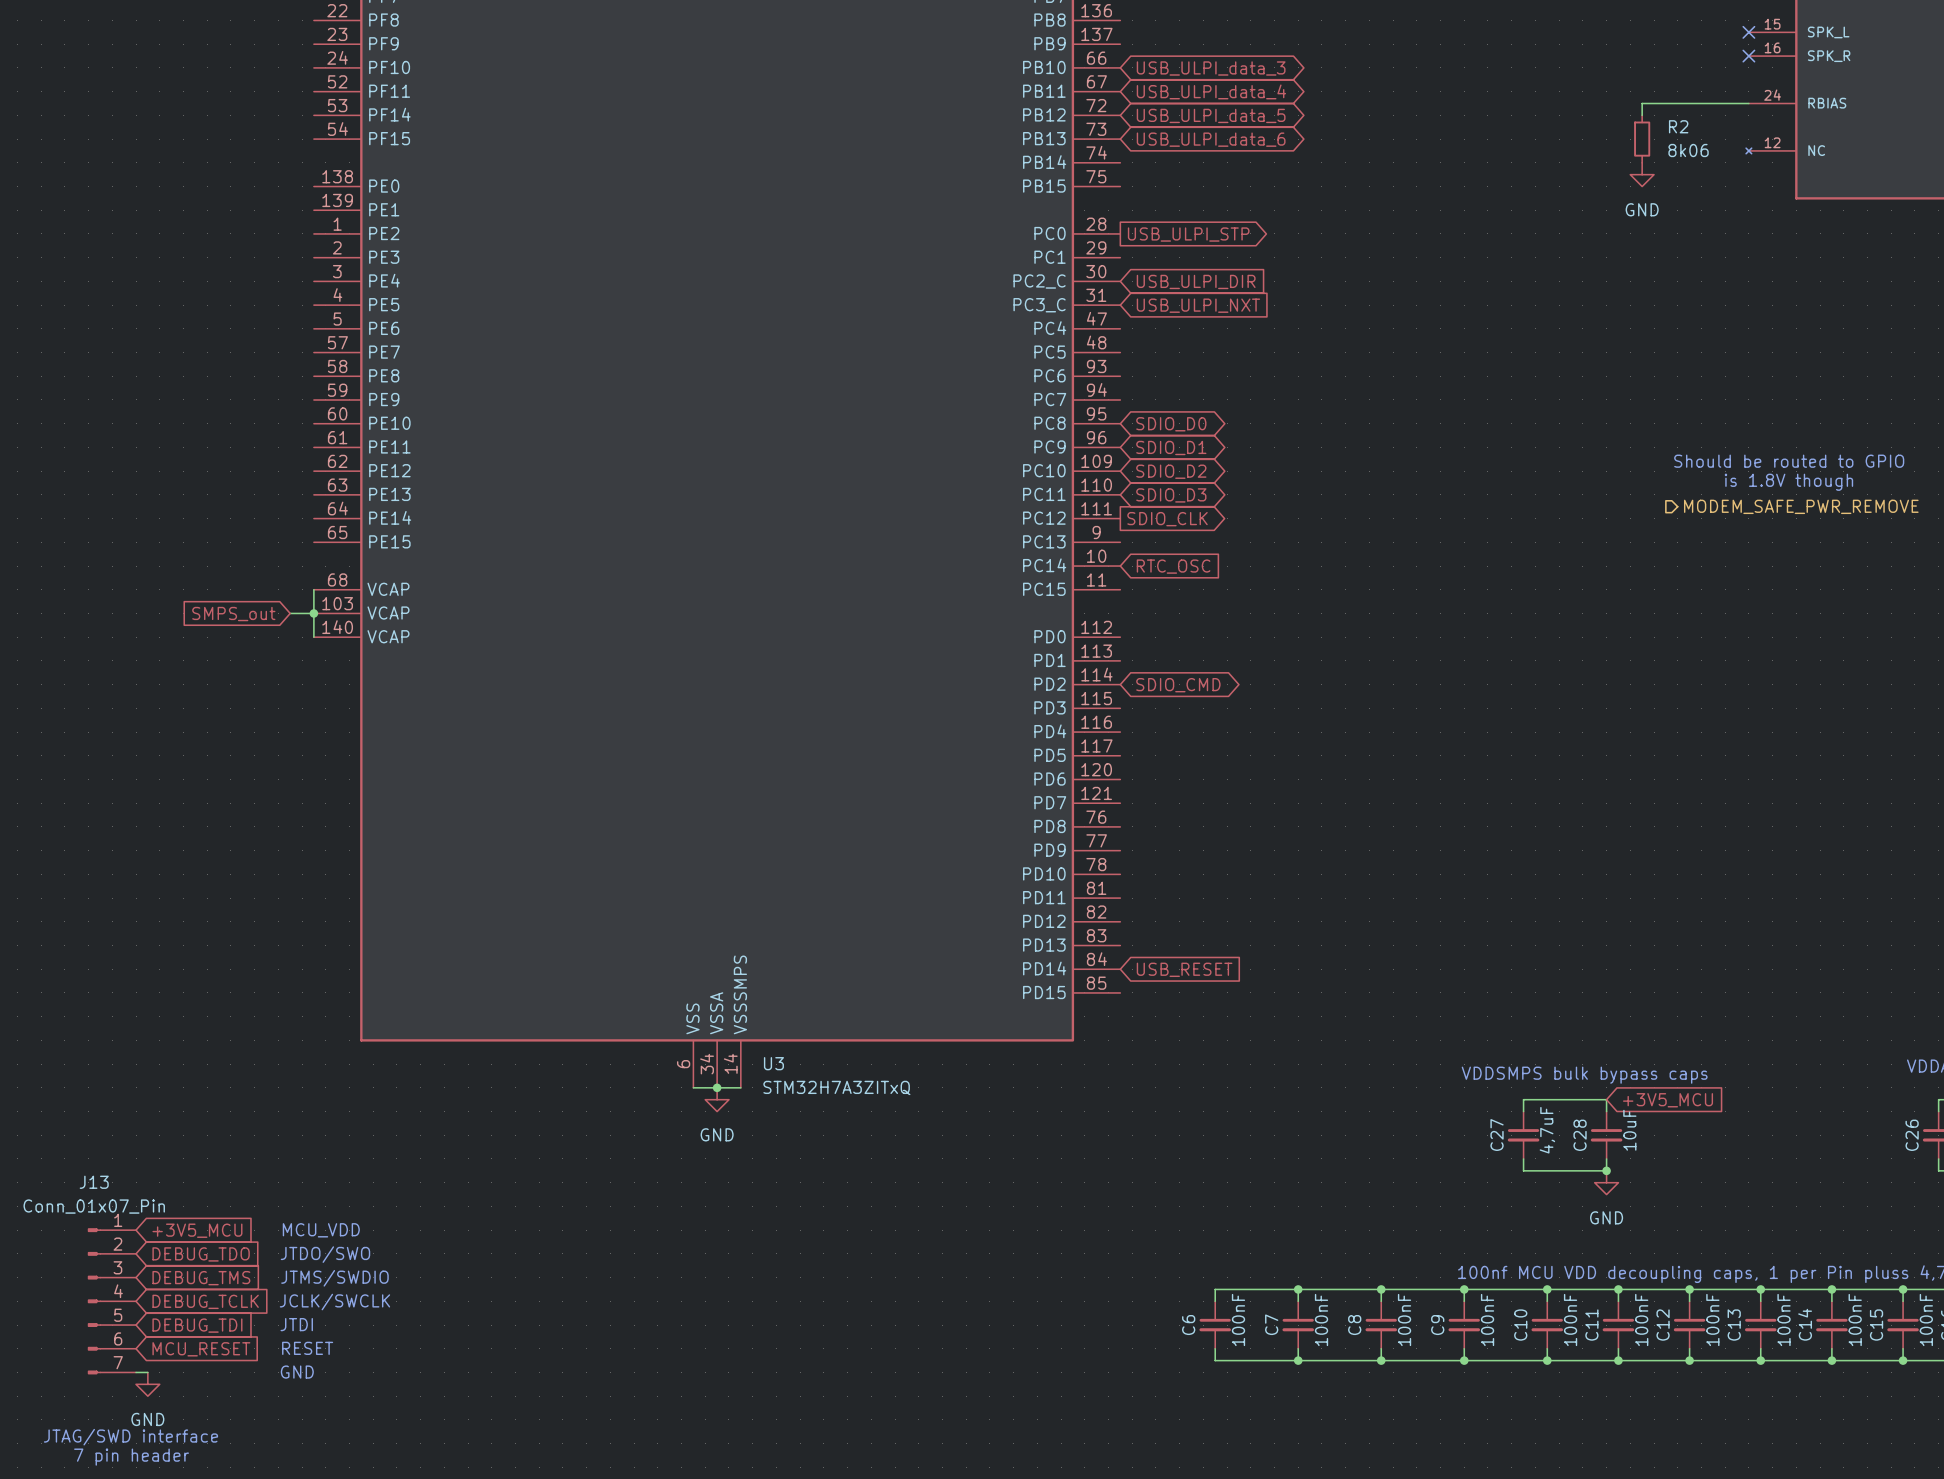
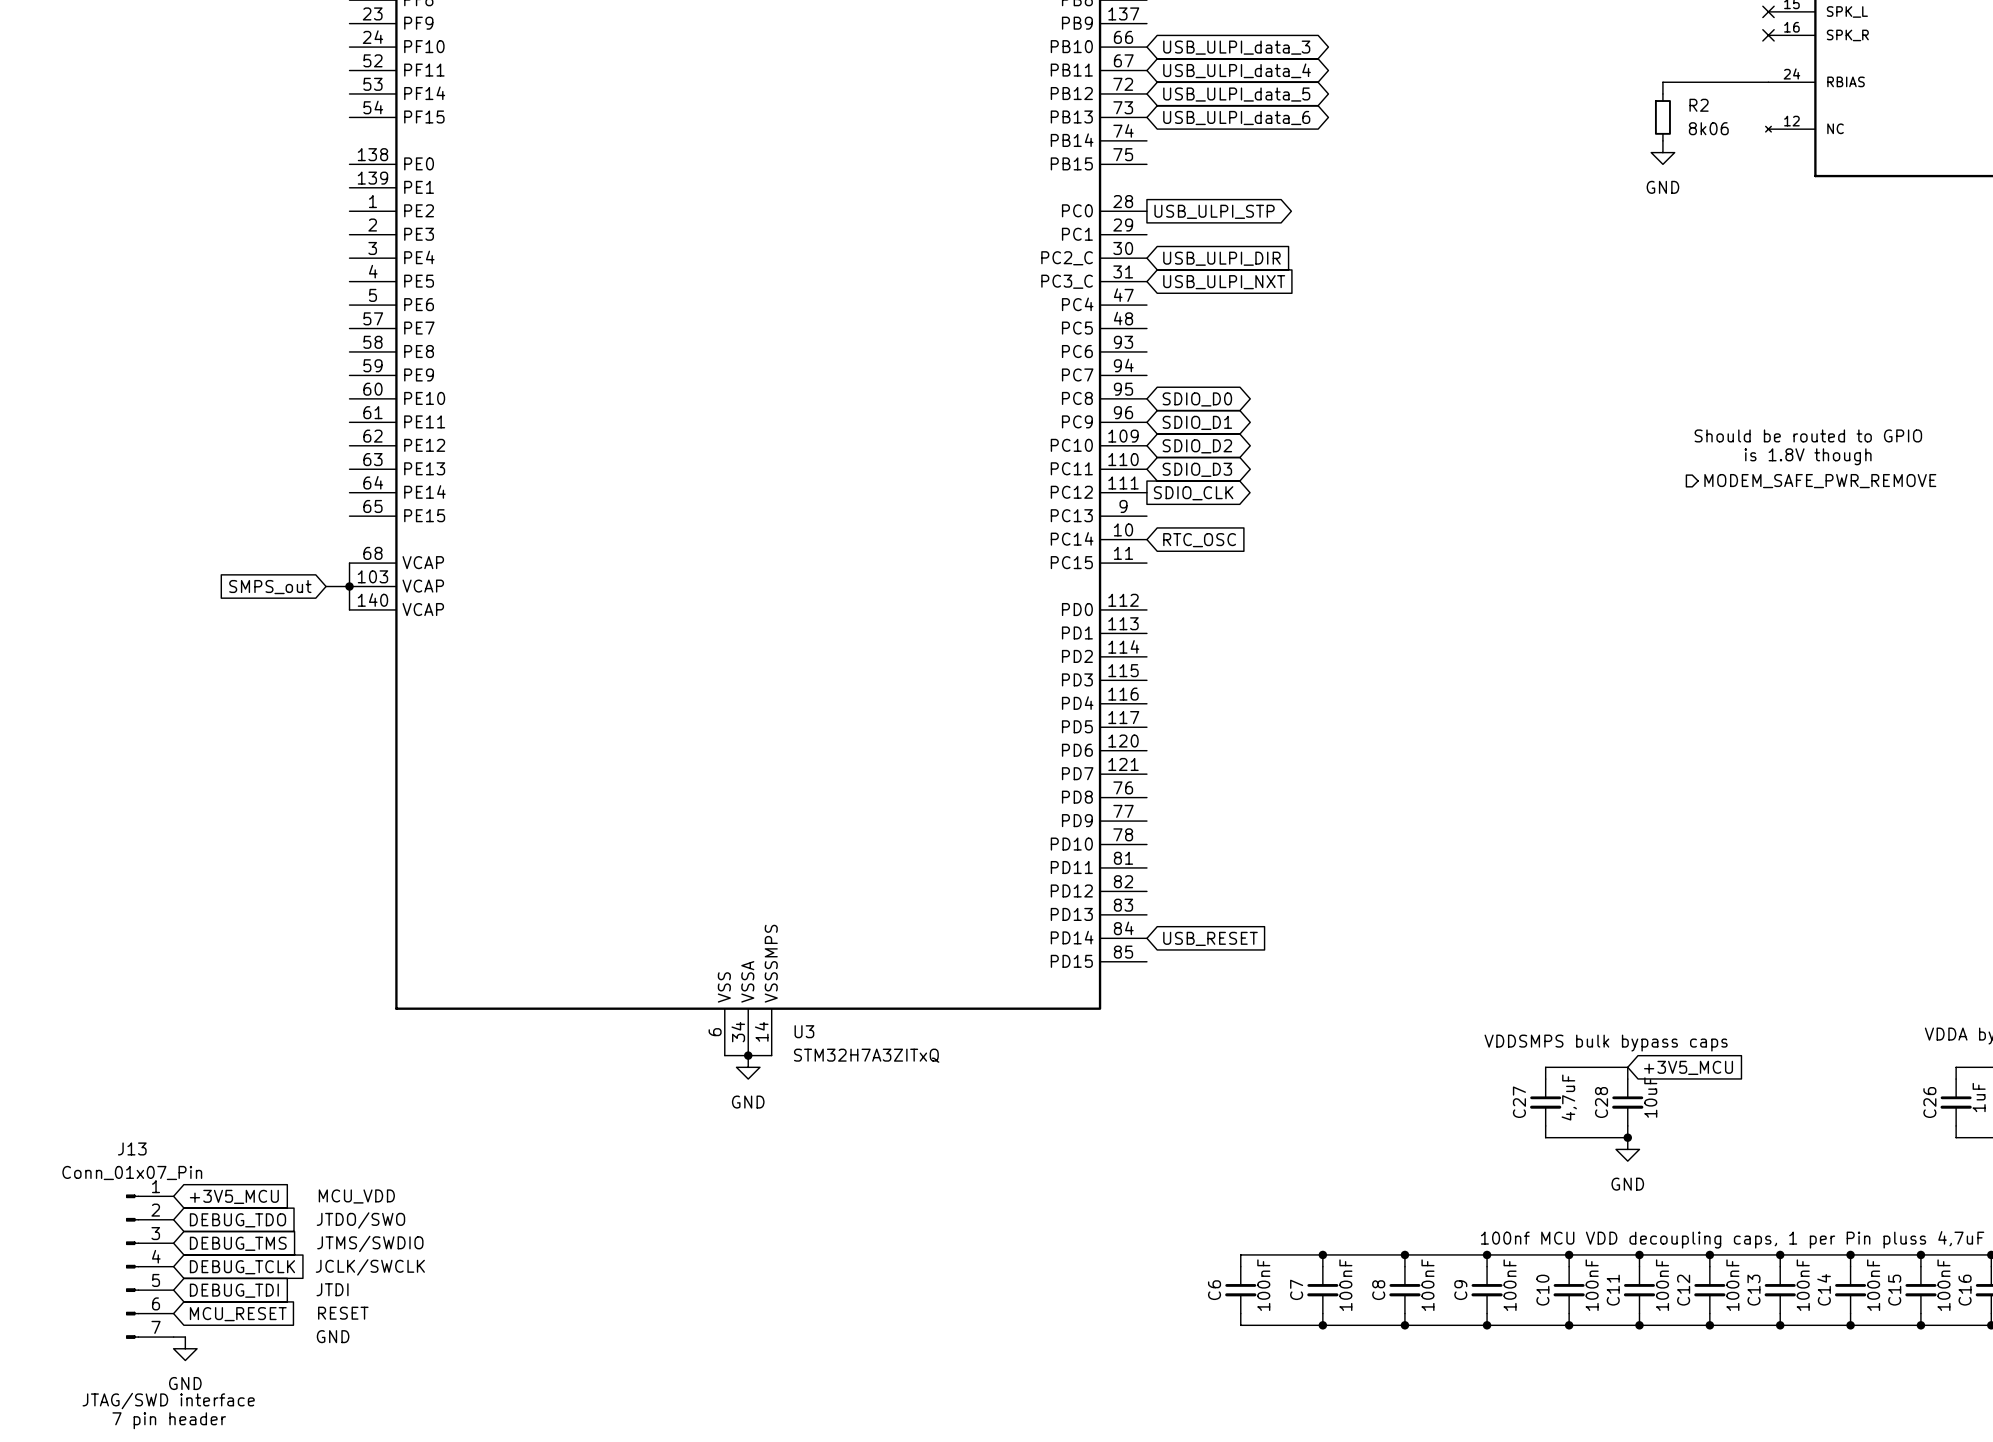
global label: SDIO_CMD (1178, 685) -> none

